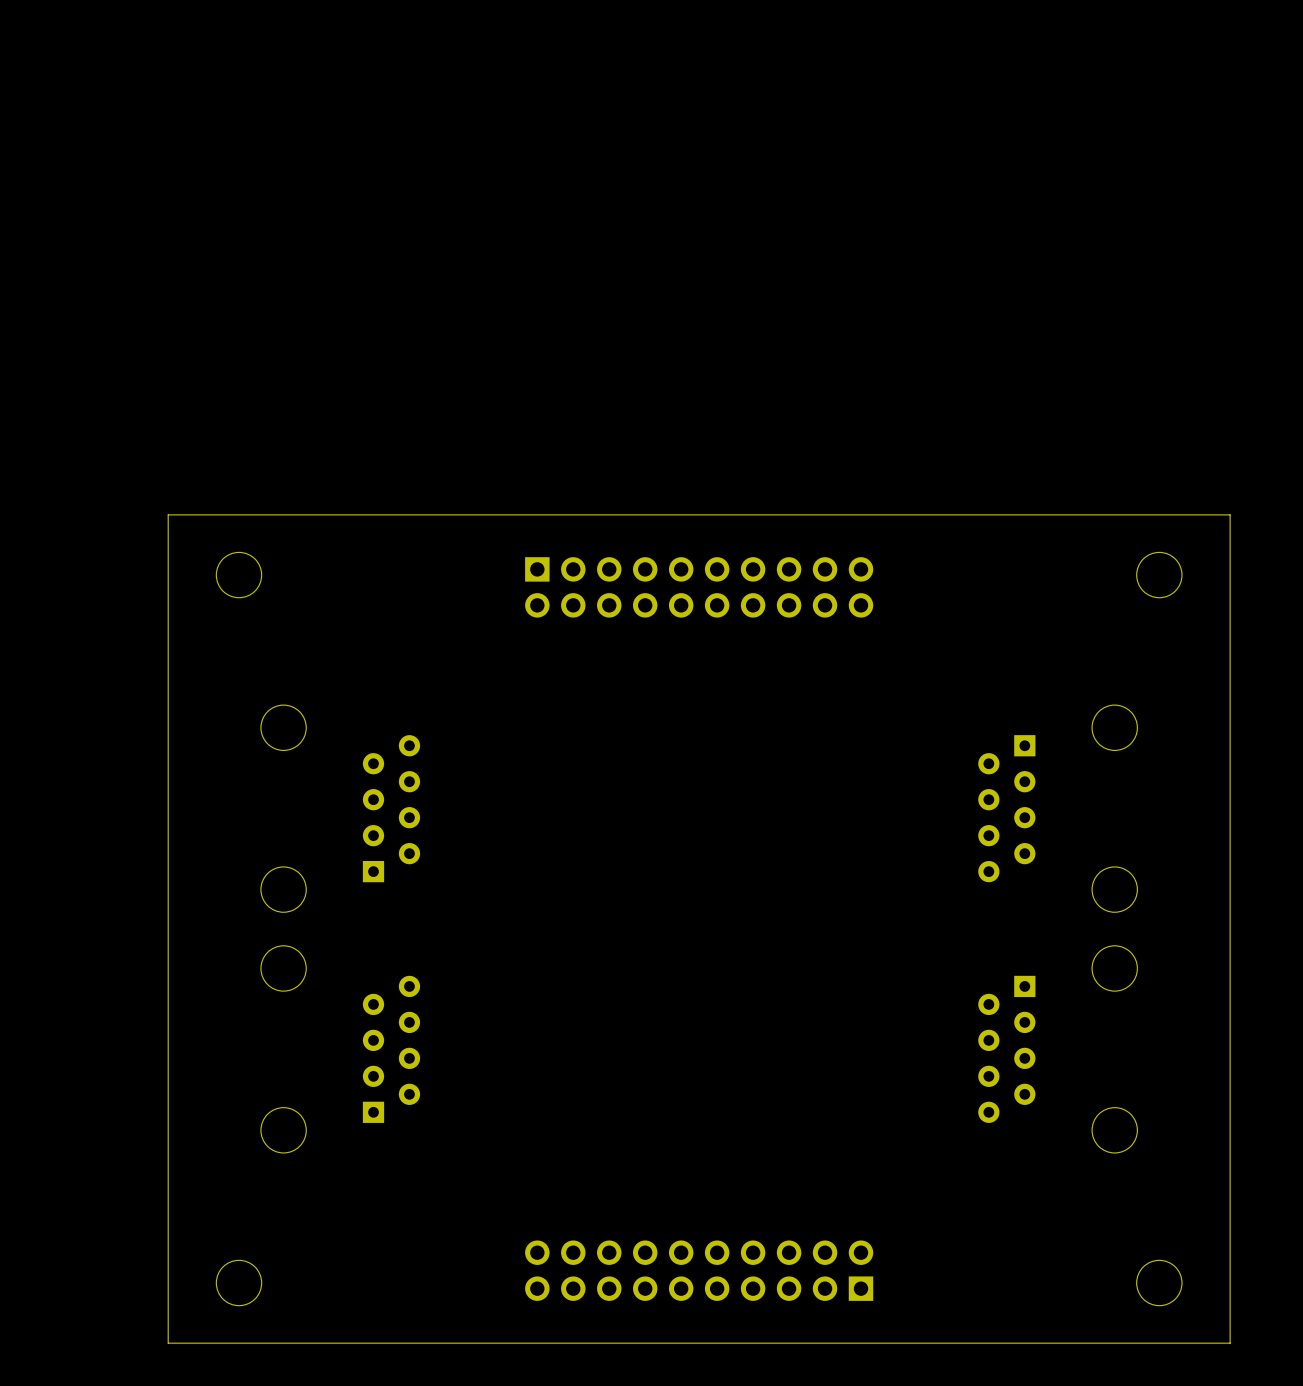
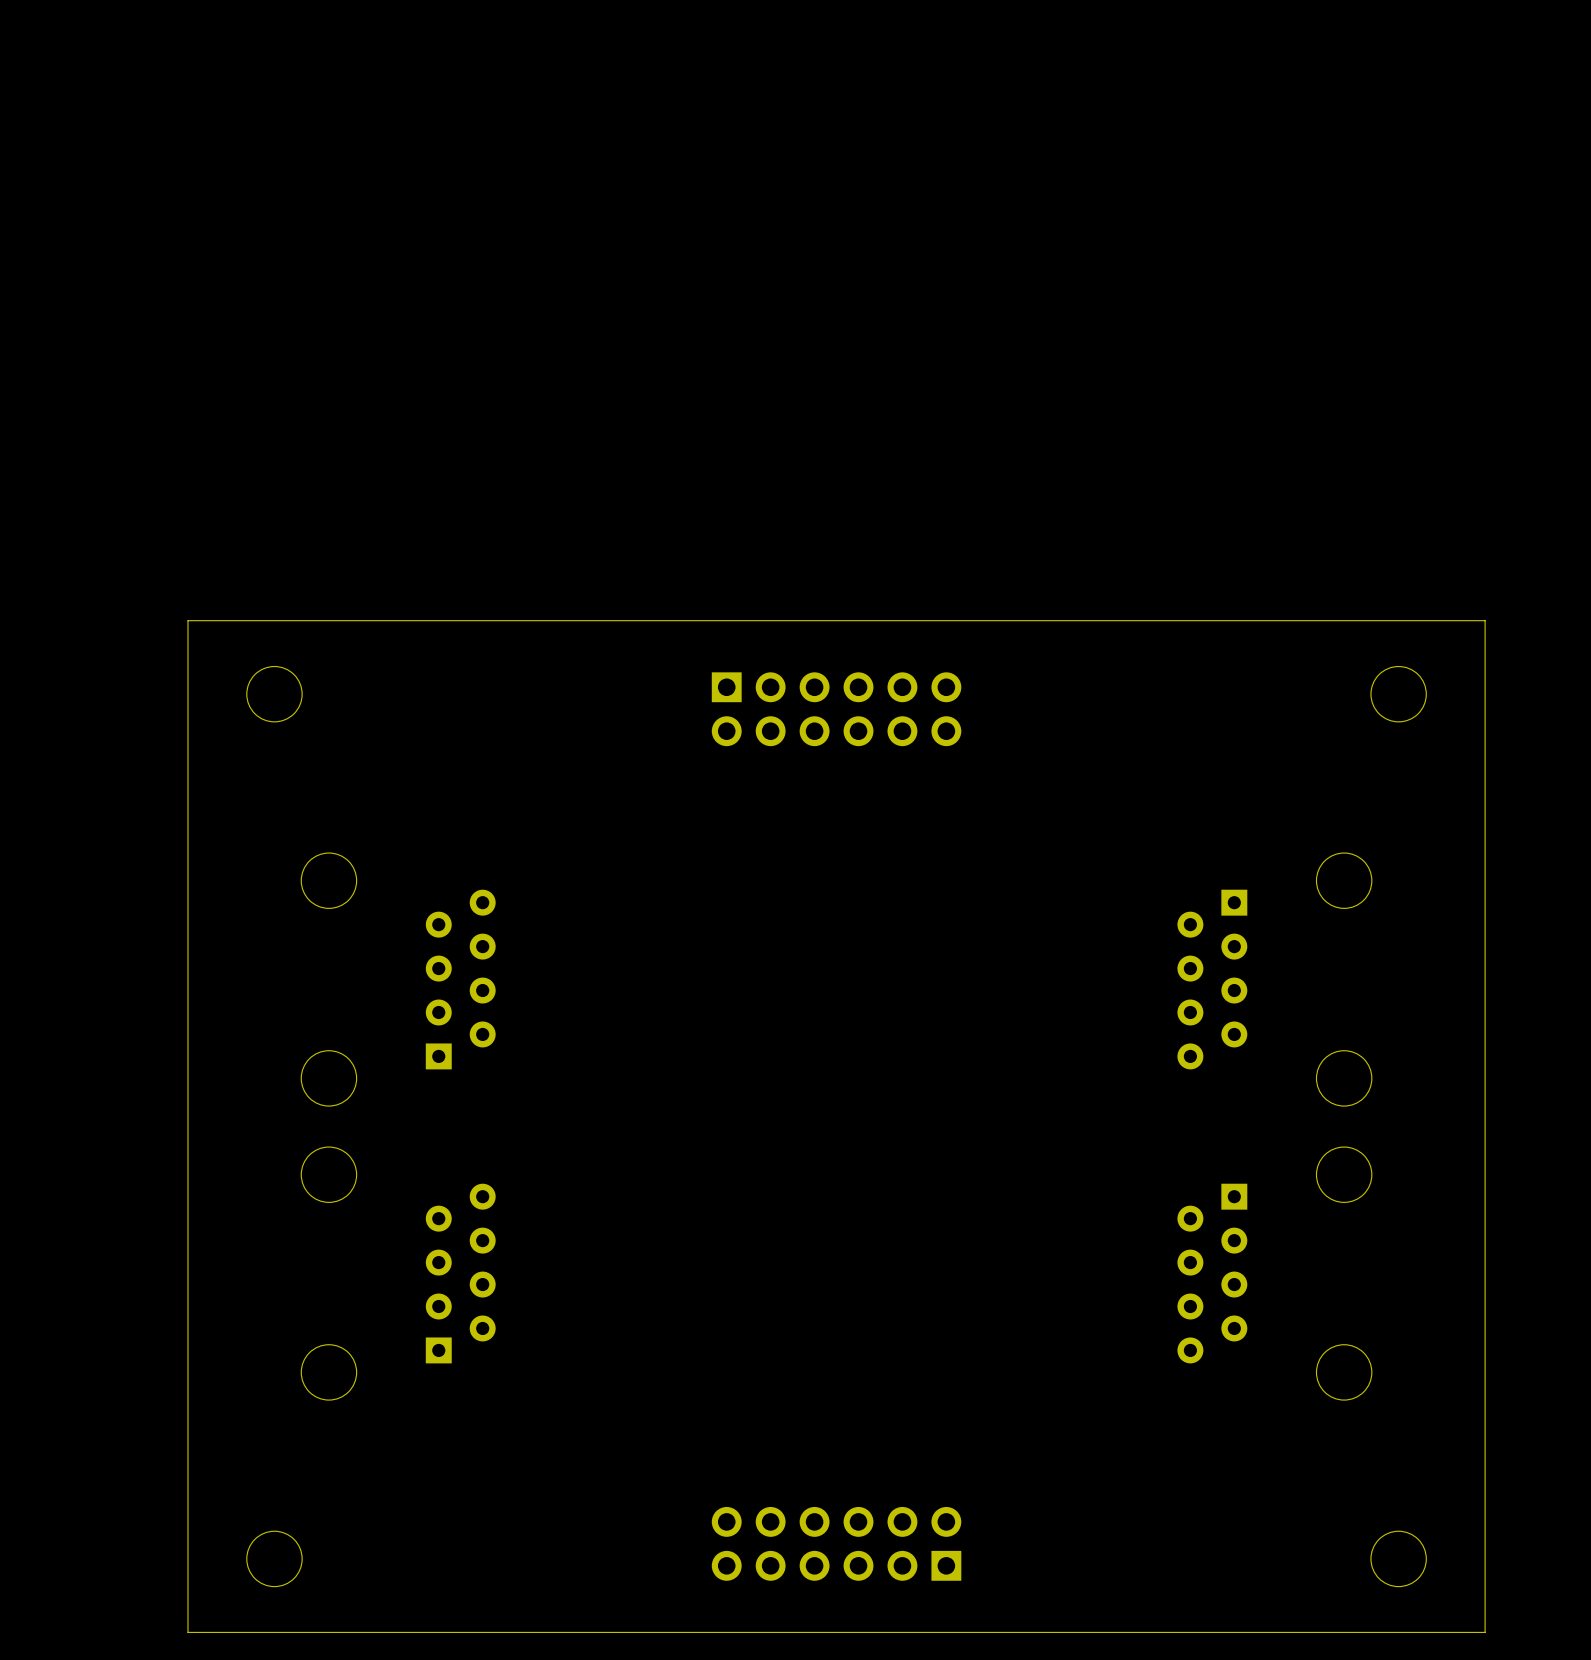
part footprint: [525, 557, 874, 618] -> [711, 672, 962, 747]
part footprint: [525, 1240, 874, 1301] -> [711, 1506, 962, 1581]

